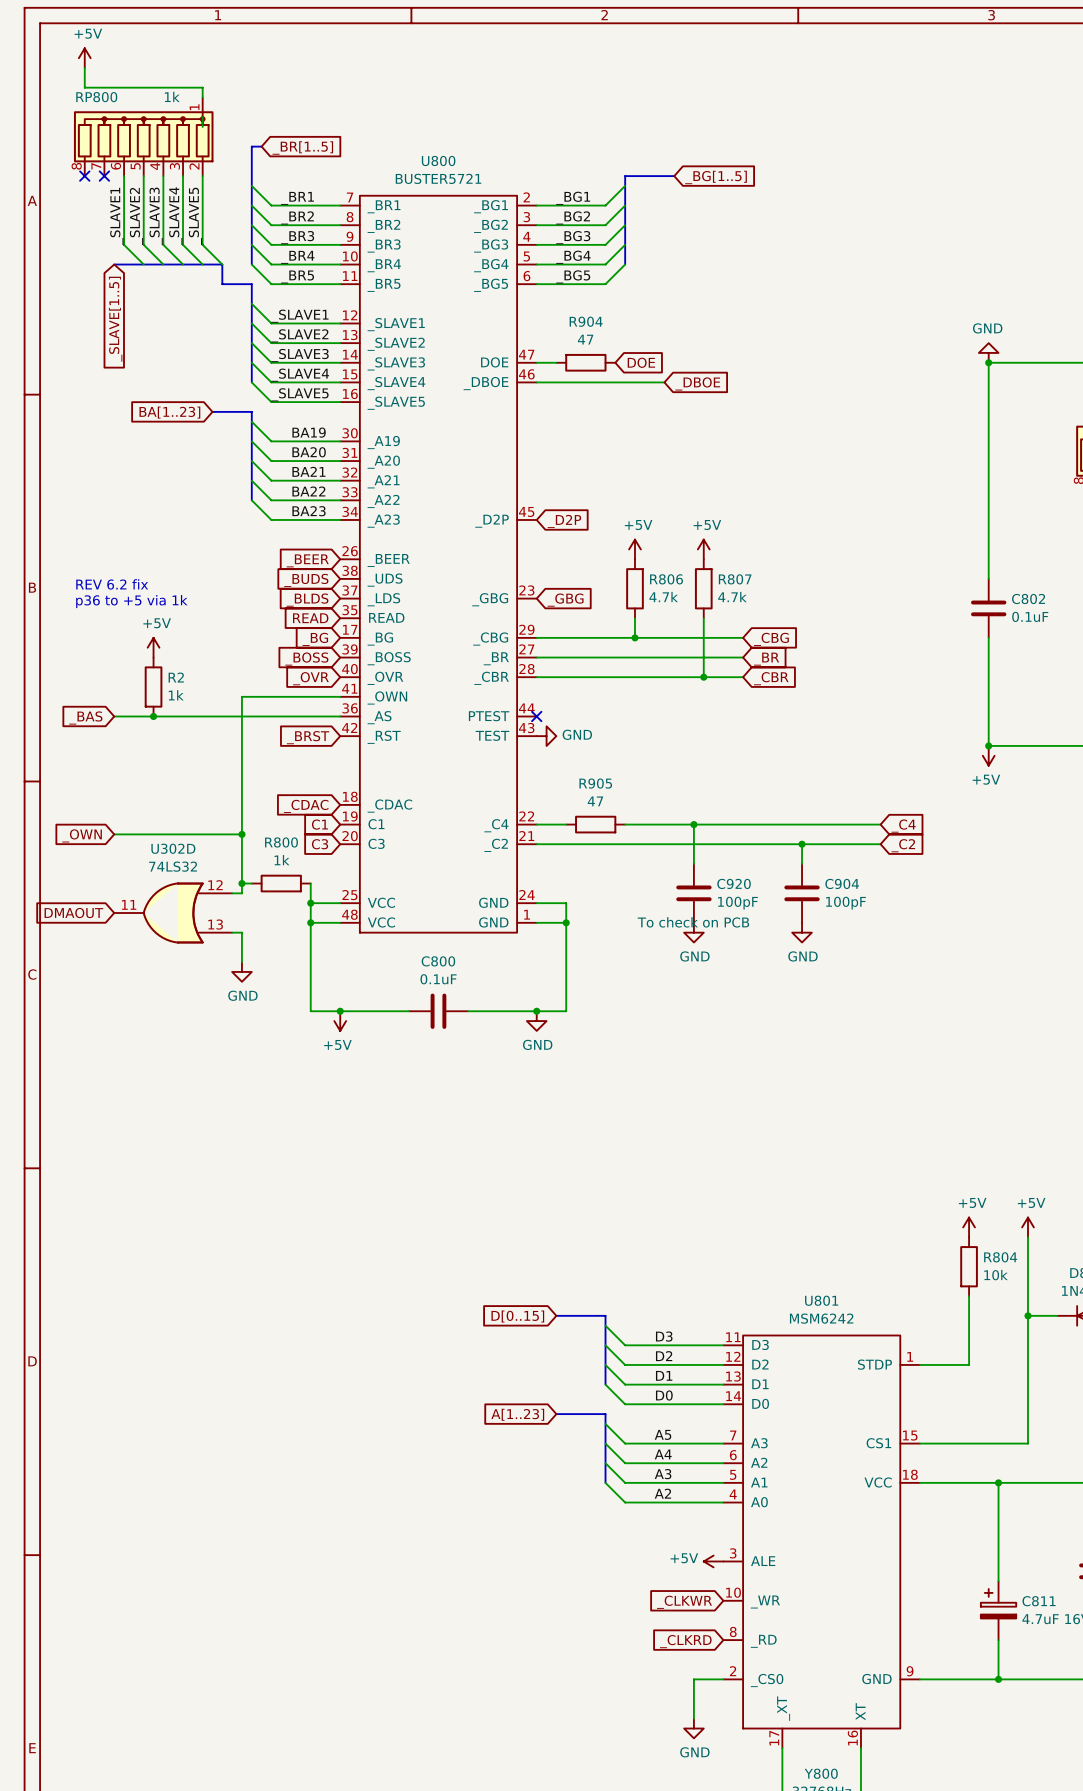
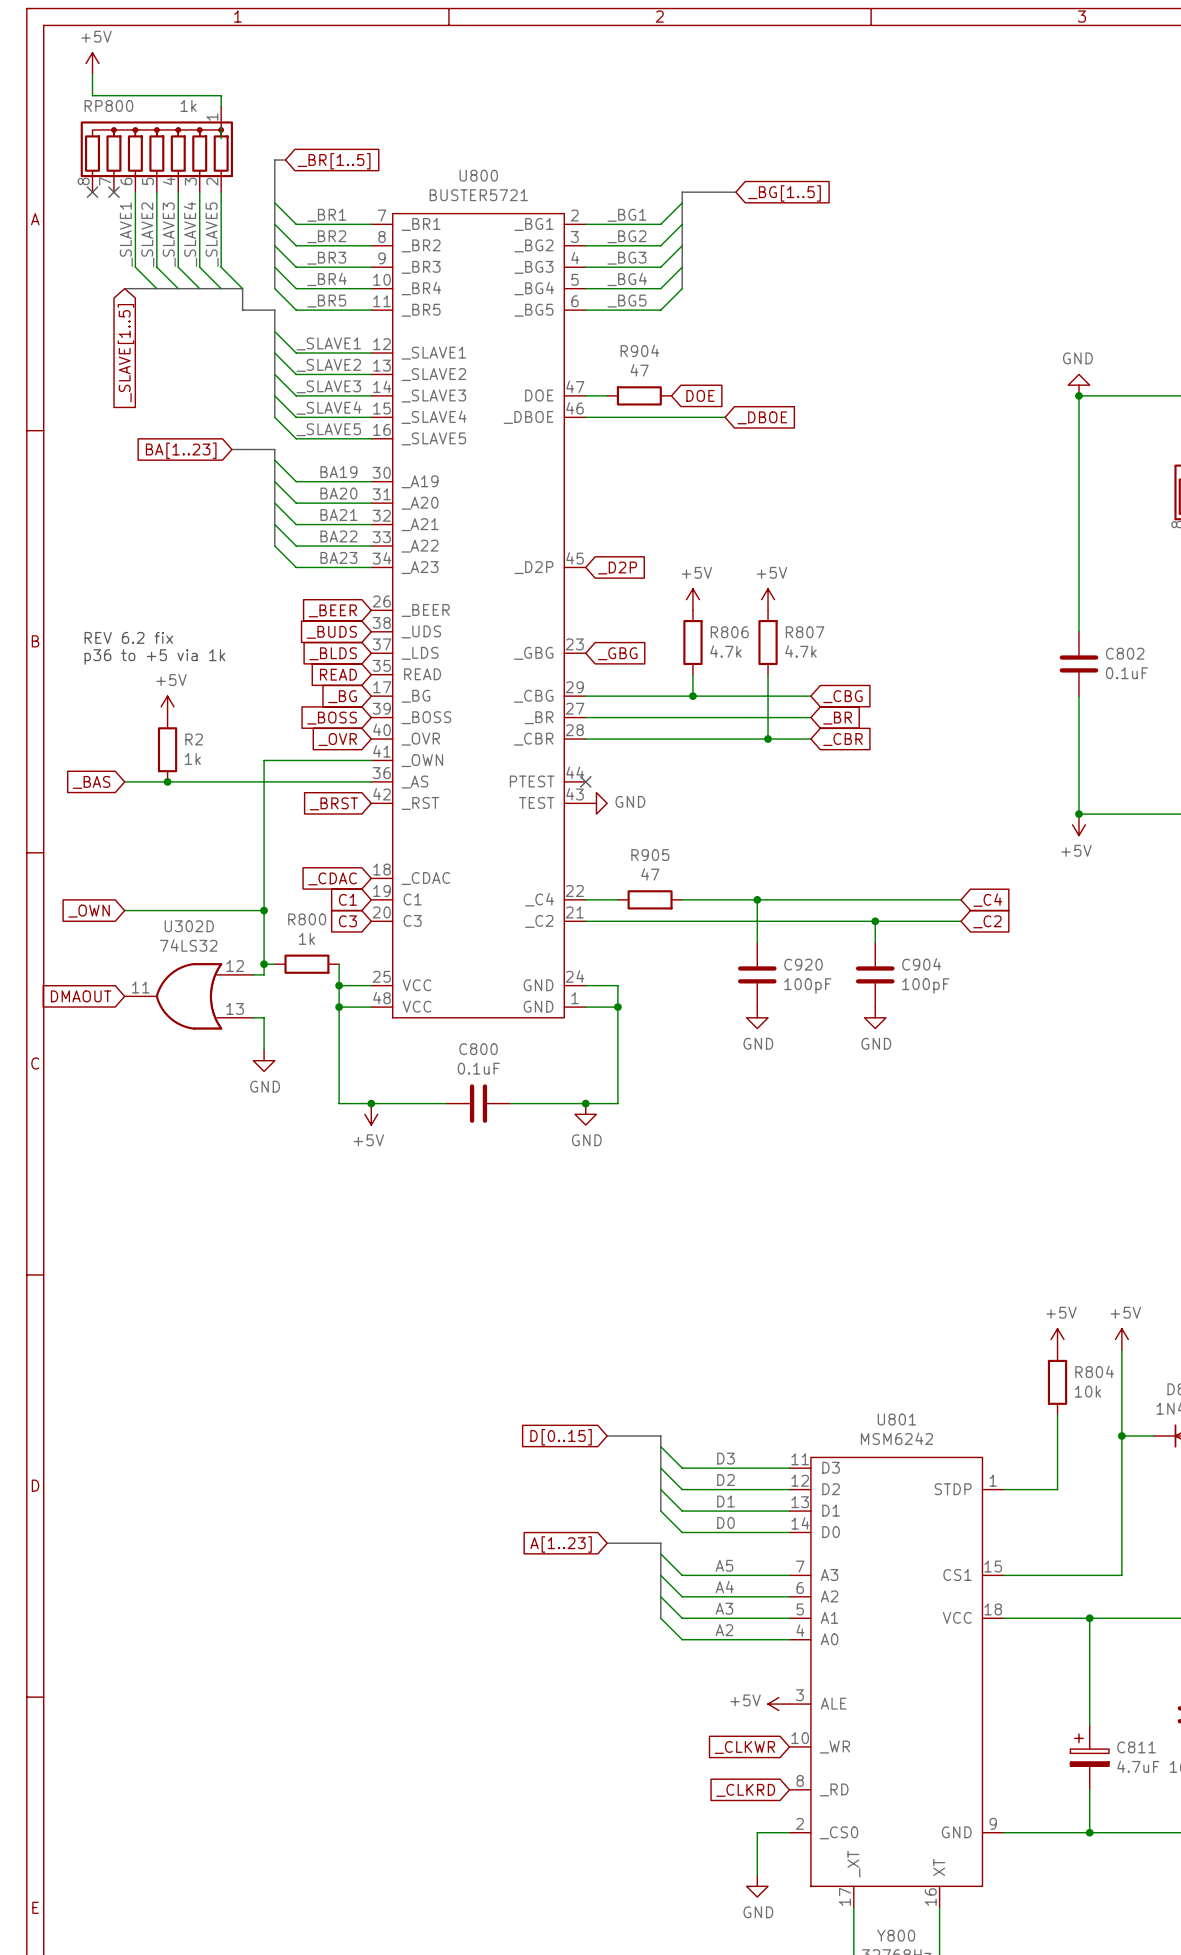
C920 text: To check on PCB (693, 922) -> none

